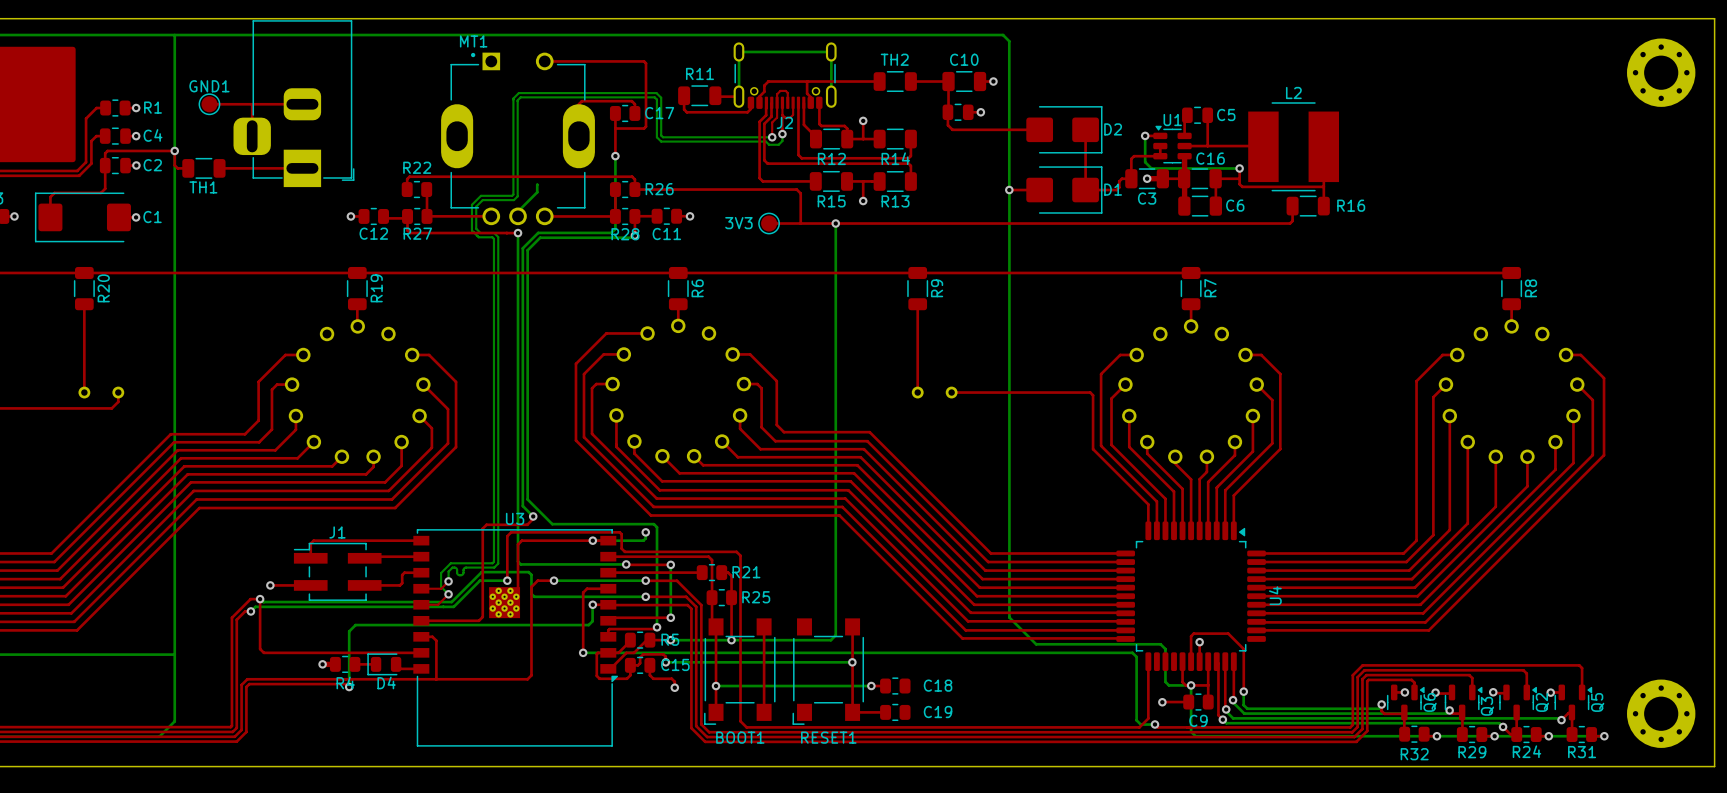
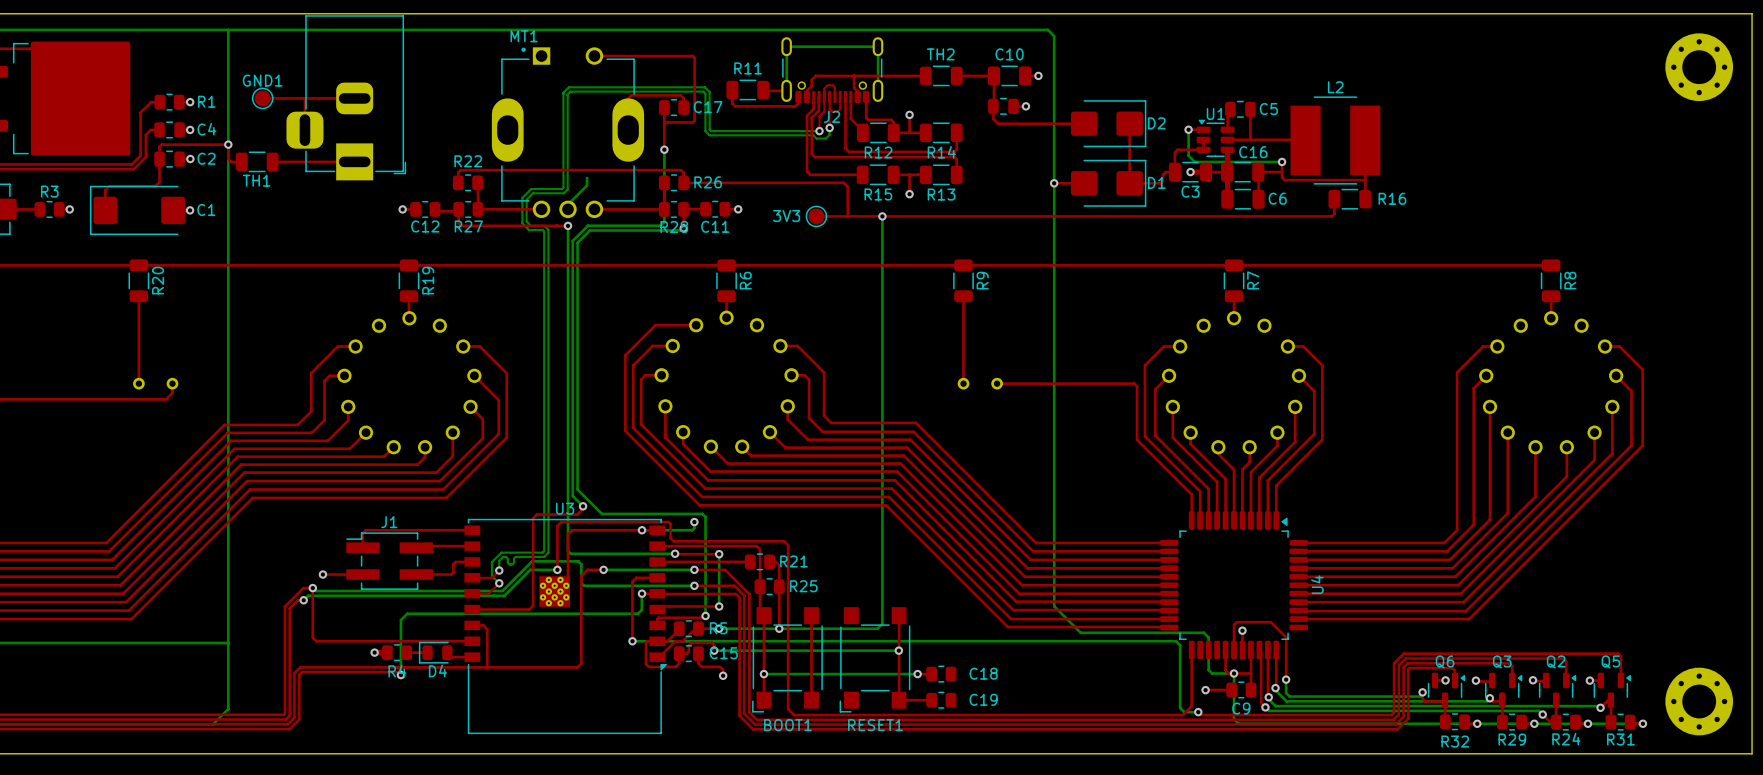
Q6 name rotation: 0° (1430, 702) -> 90° clockwise (1445, 661)
Q6 name position: Q6 (1430, 702) -> Q6 (1445, 661)
Q2 name rotation: 0° (1542, 702) -> 90° clockwise (1556, 661)
Q2 name position: Q2 (1542, 702) -> Q2 (1556, 661)
Q5 name rotation: 0° (1597, 702) -> 90° clockwise (1610, 661)
Q5 name position: Q5 (1597, 702) -> Q5 (1610, 661)
Q3 name rotation: 0° (1487, 706) -> 90° clockwise (1502, 661)
Q3 name position: Q3 (1487, 706) -> Q3 (1502, 661)

